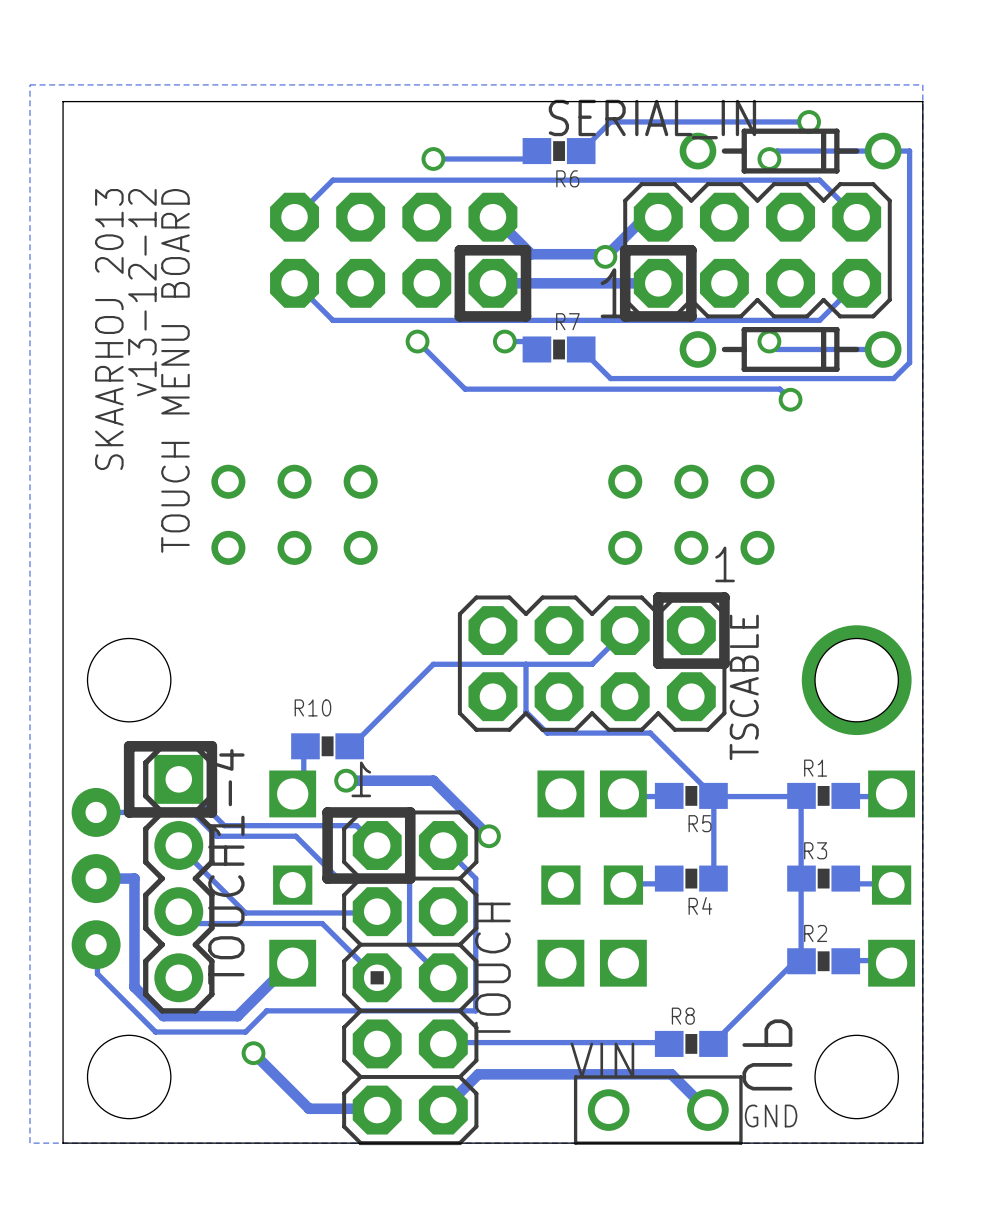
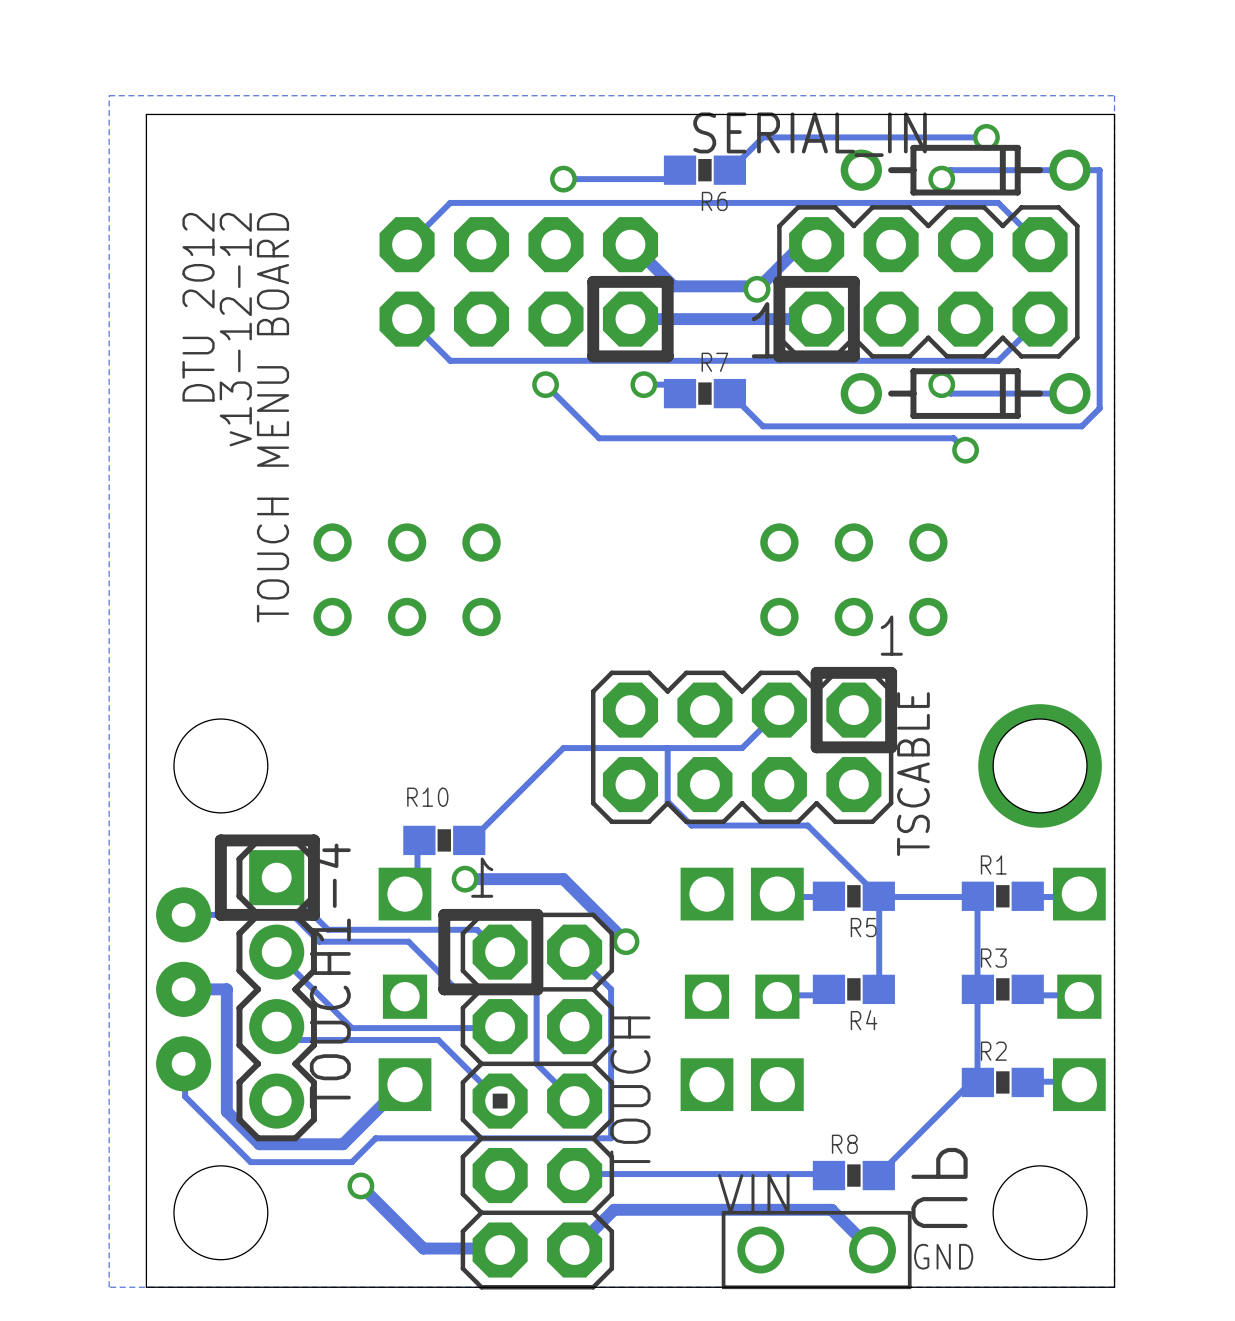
text: SKAARHOJ 2013 (109, 329) -> DTU 2012 (198, 307)

